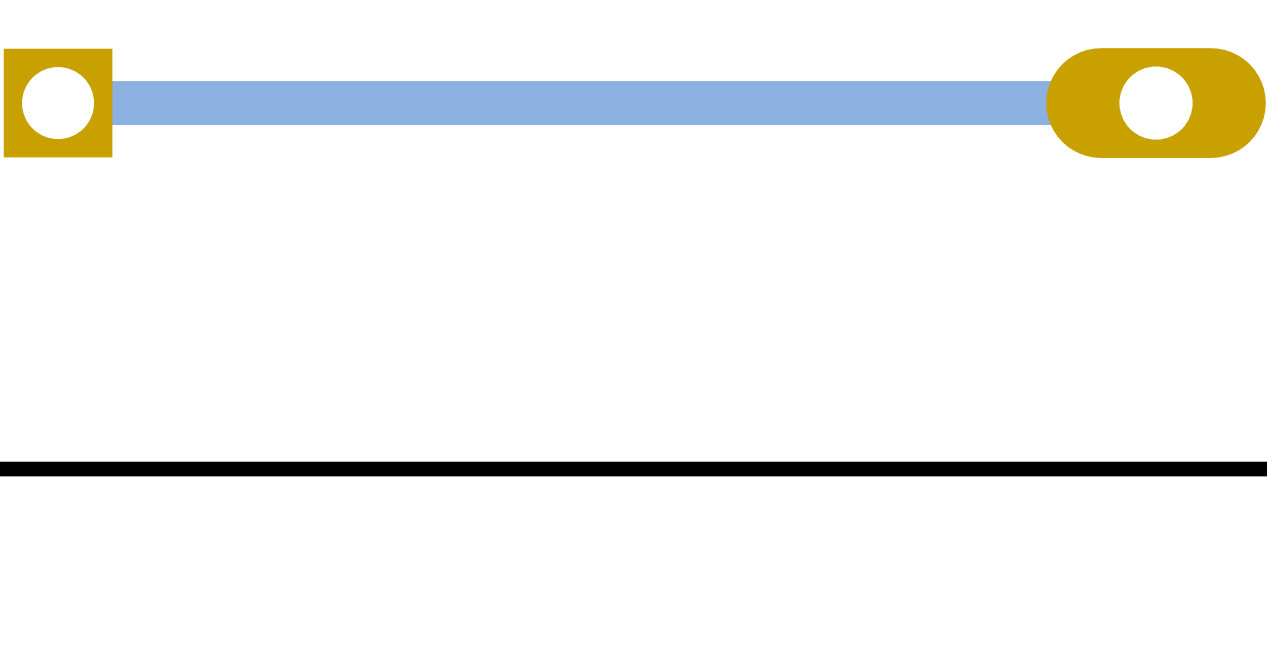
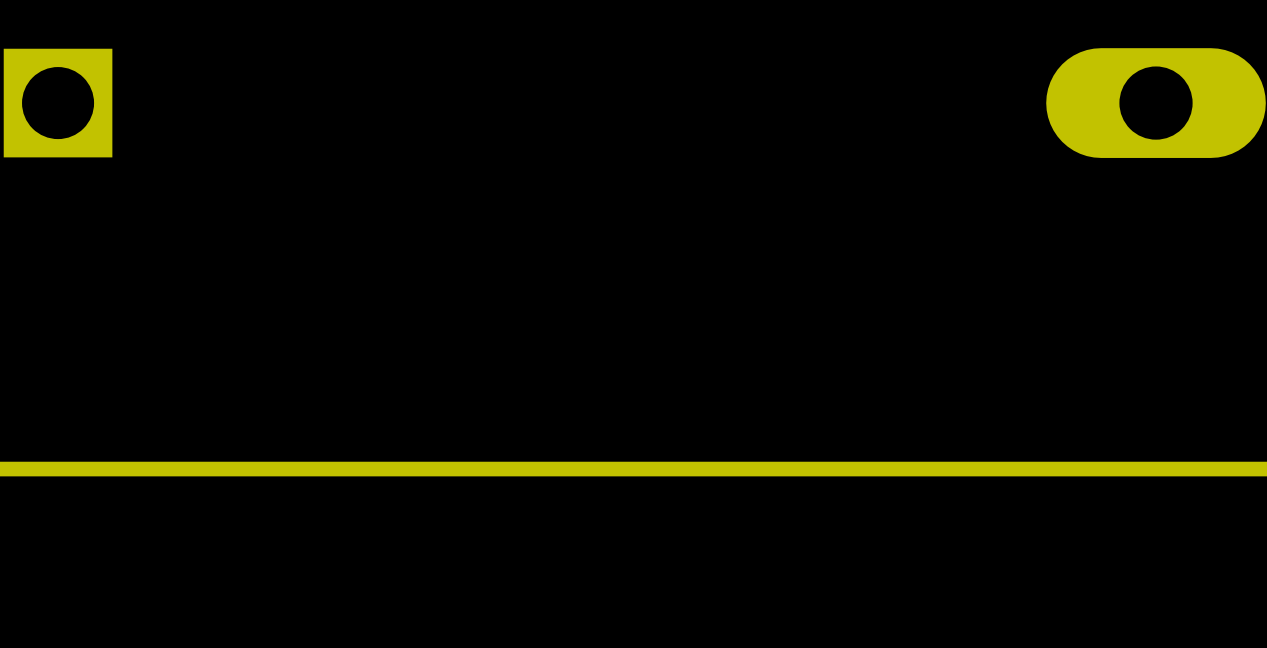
track: (1156, 103) (58, 103) -> none

